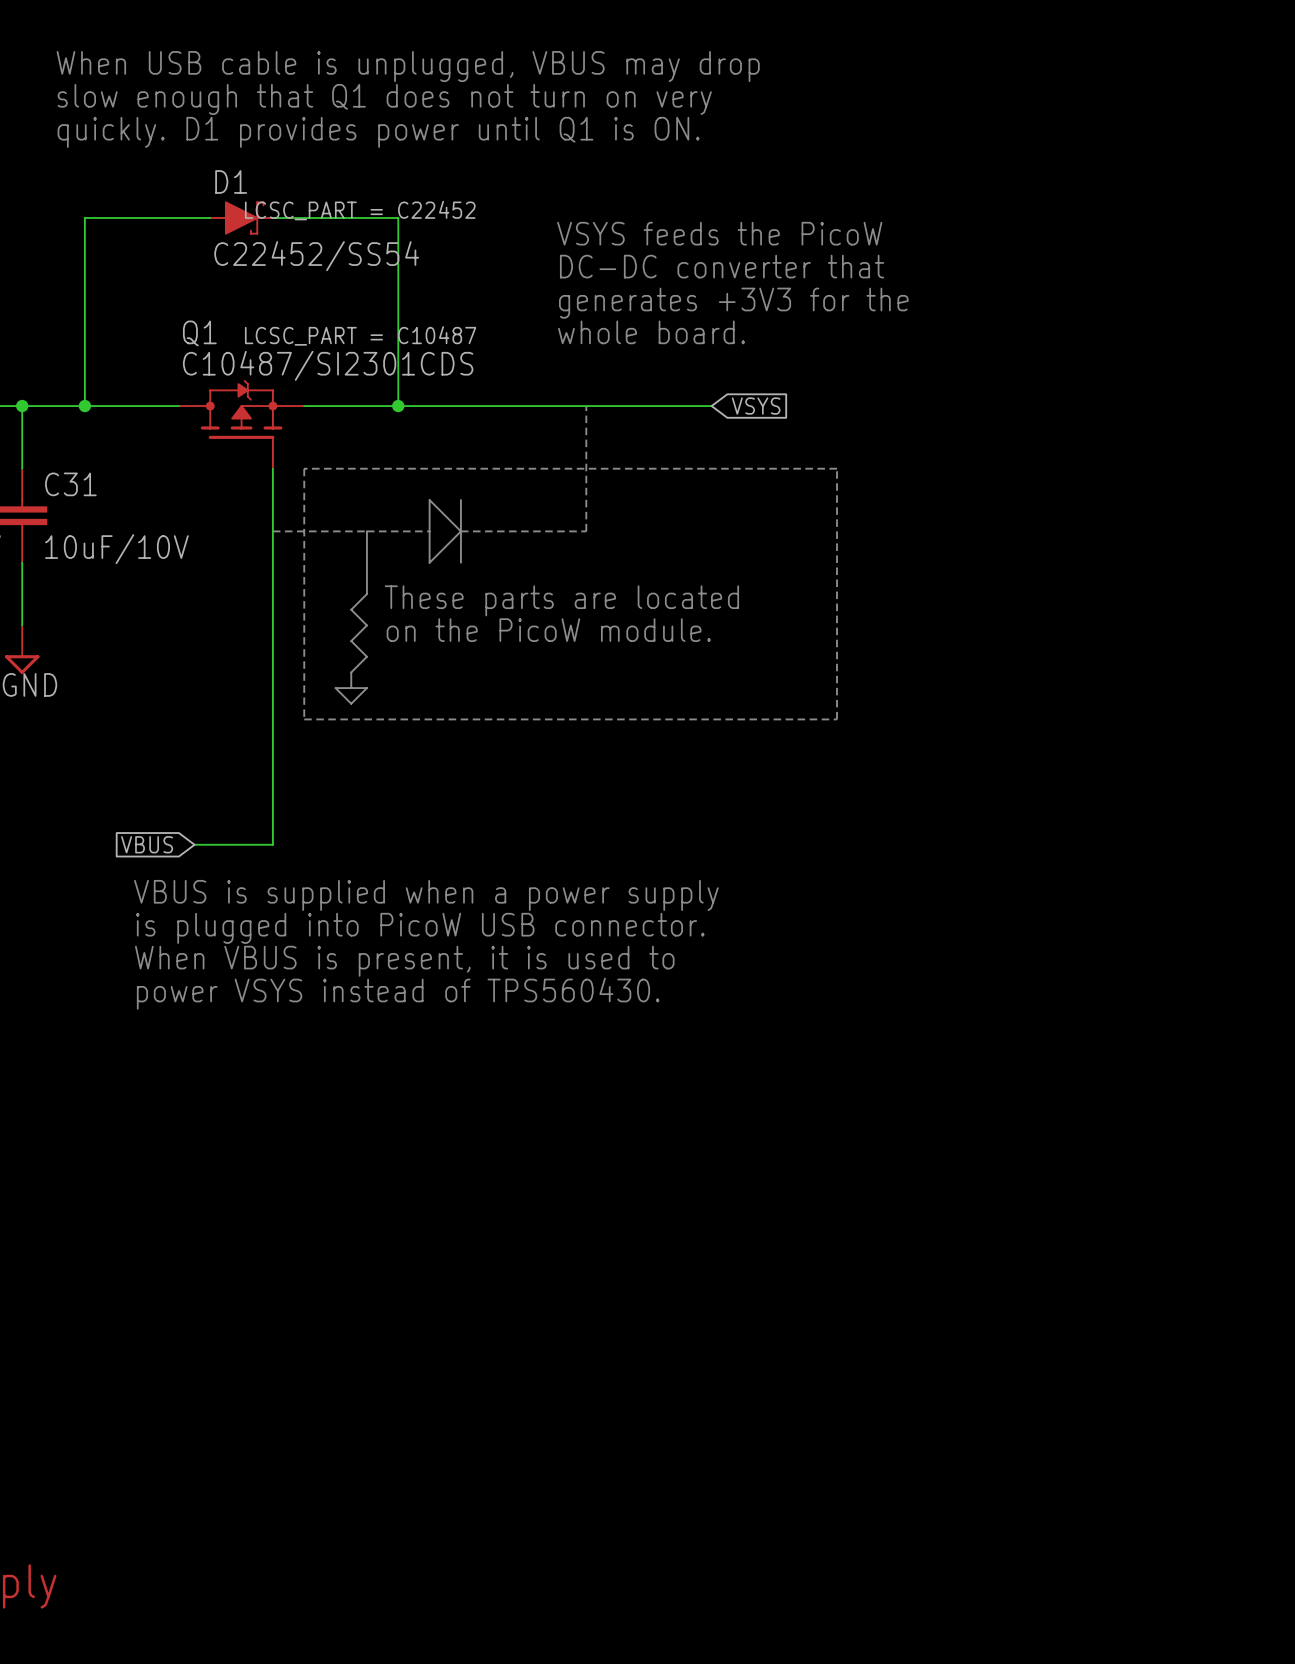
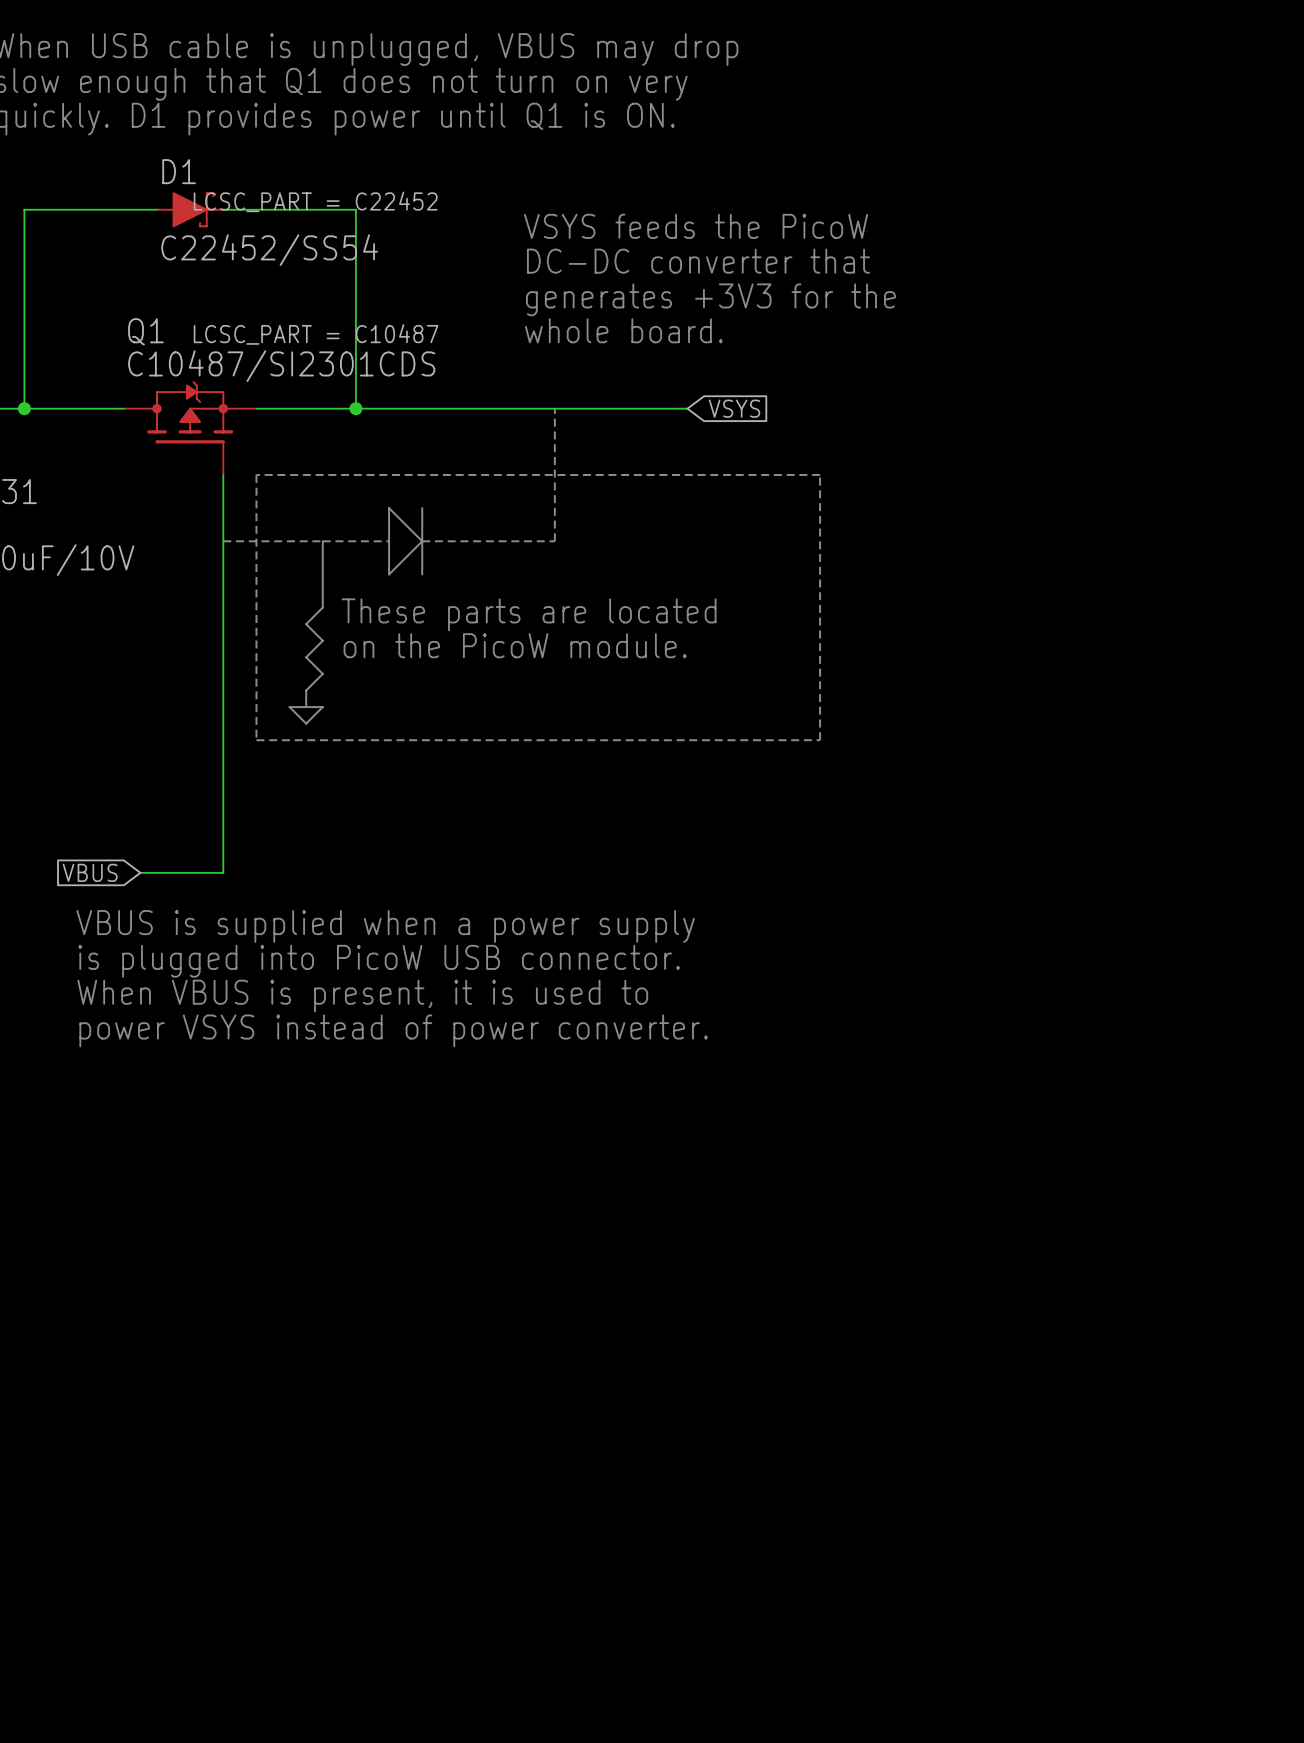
text: power VSYS instead of TPS560430. (398, 993) -> power VSYS instead of power converter. (393, 1030)

